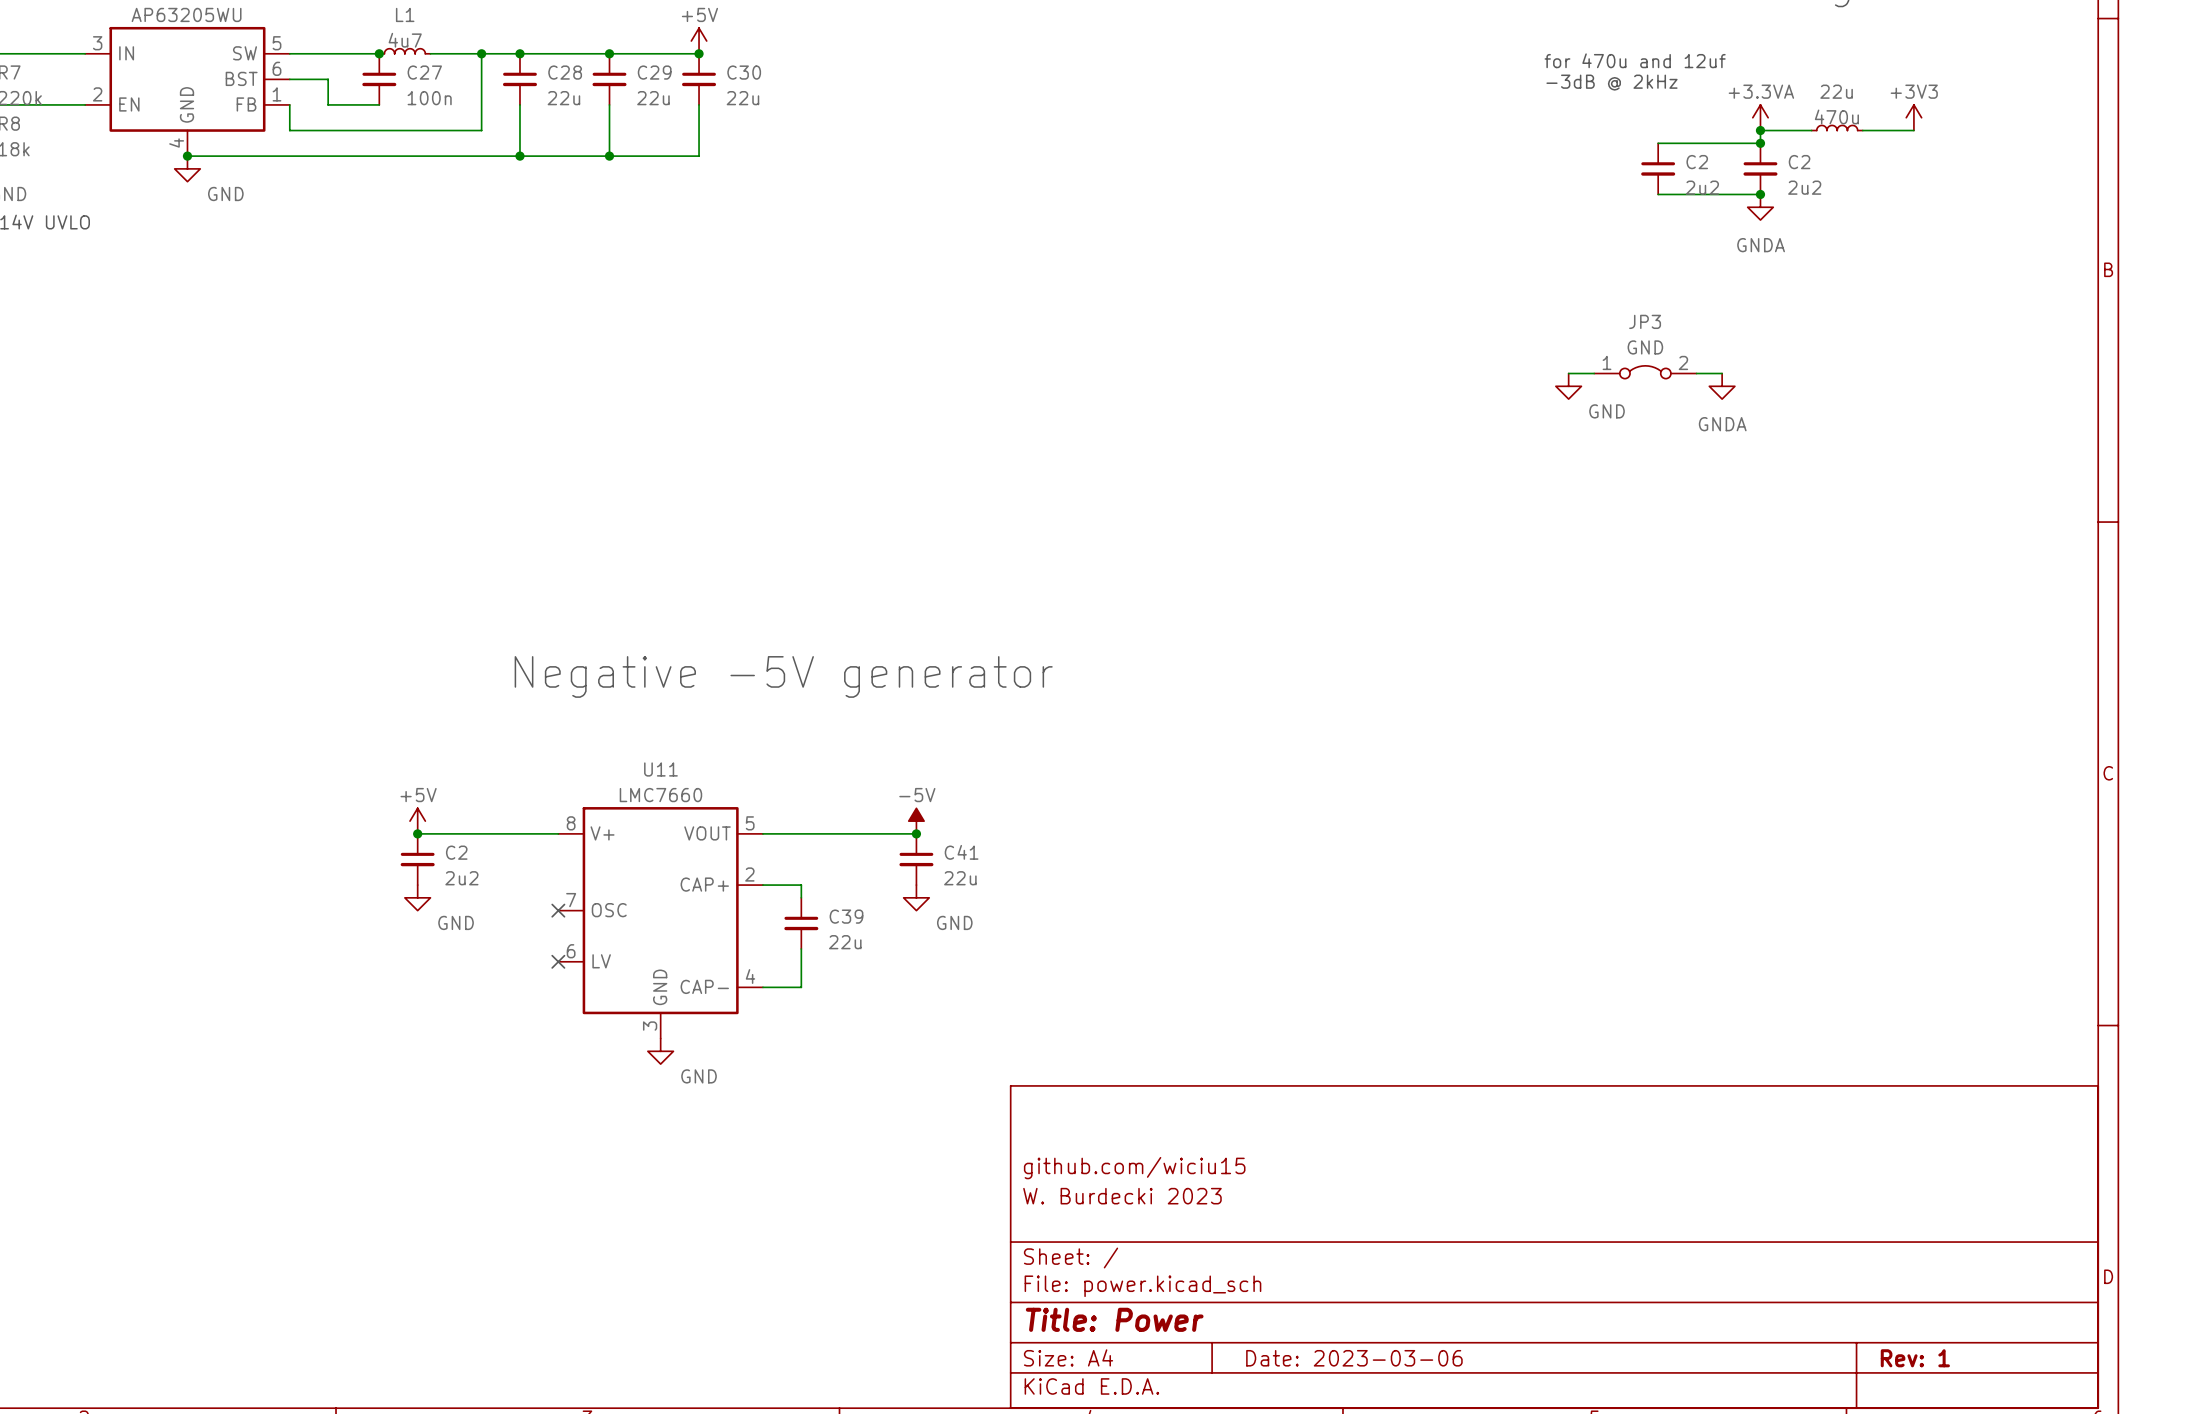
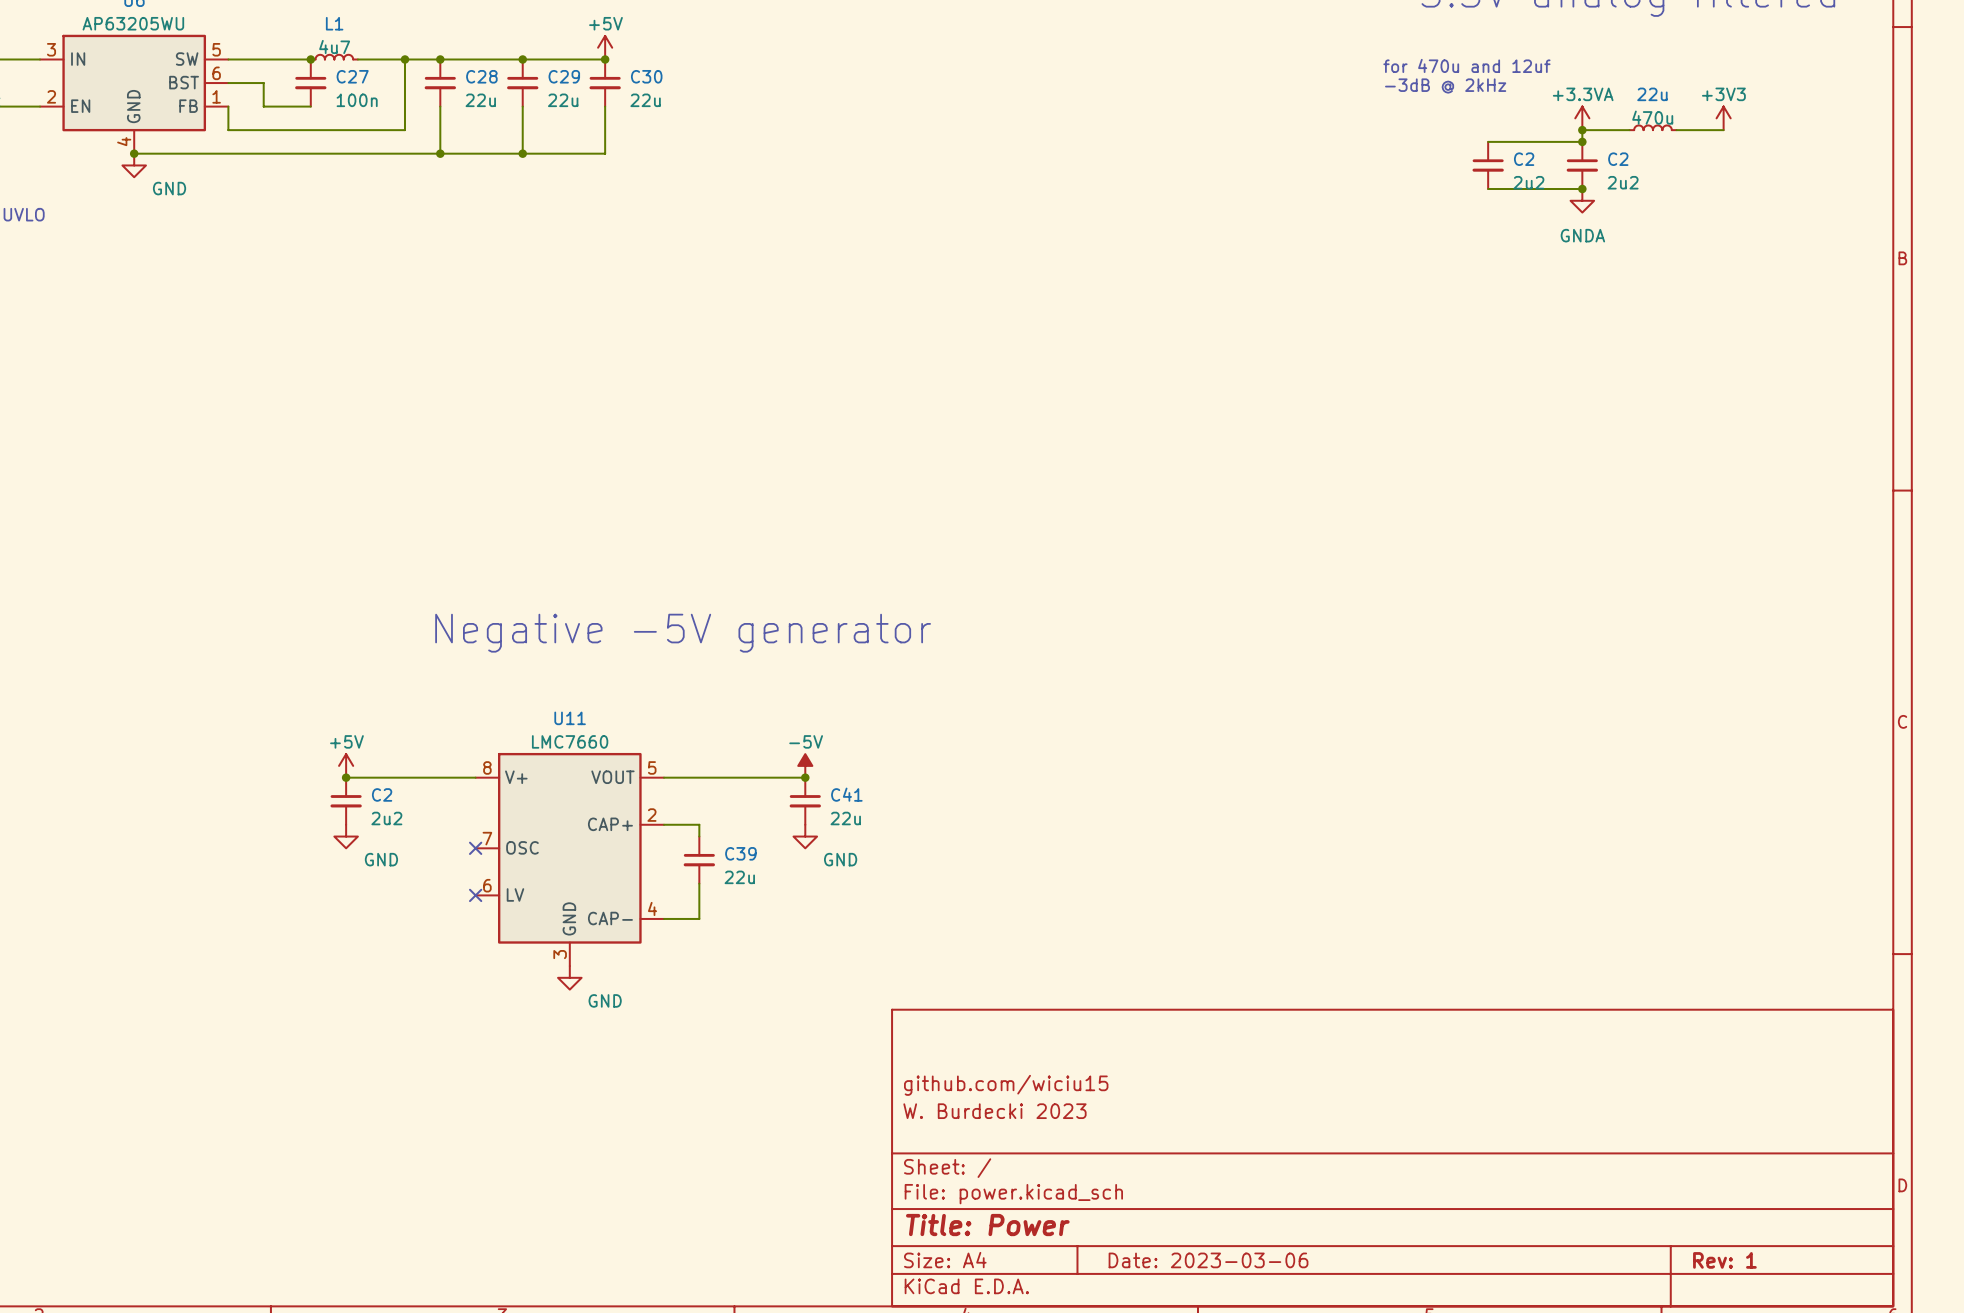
JP3: GND (1645, 372) -> none
wire: (1568, 373) (1594, 373) -> none
wire: (1696, 373) (1722, 373) -> none
power symbol: GND (1568, 386) -> none
power symbol: GNDA (1722, 386) -> none

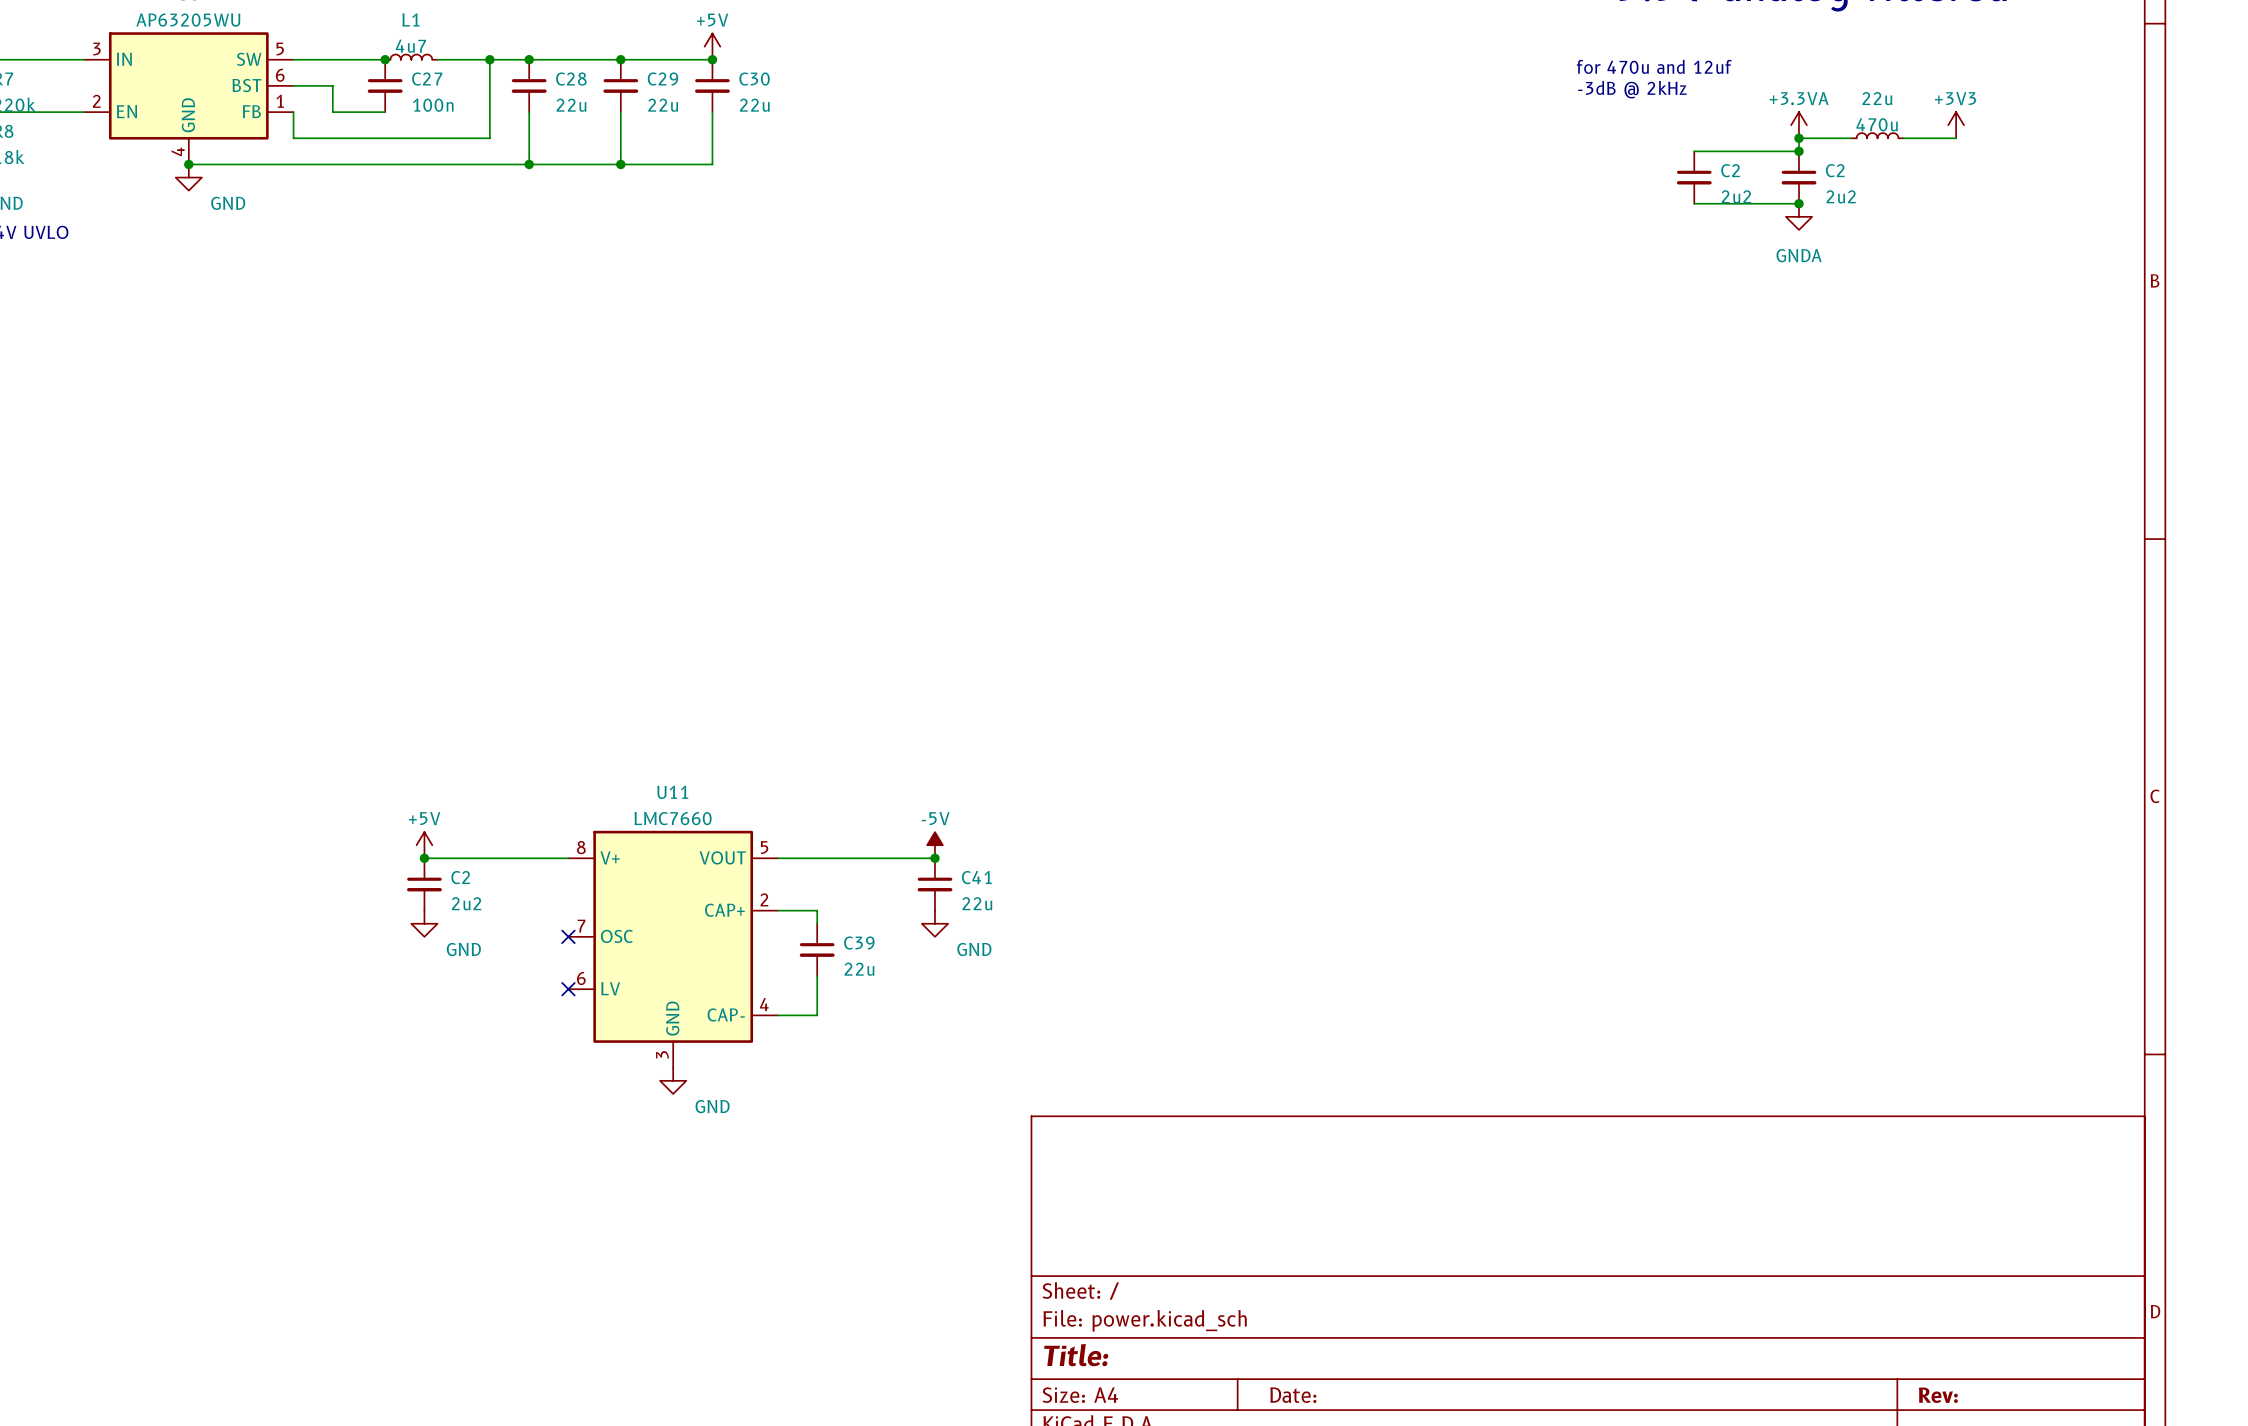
text: Negative -5V generator (683, 633) -> none
title block: github.com/wiciu15 (1006, 1085) -> none
title block: W. Burdecki 2023 (994, 1111) -> none
title block: Title: Power (987, 1225) -> Title: (1076, 1355)
title block: Date: 2023-03-06 (1208, 1260) -> Date: (1293, 1395)
title block: Rev: 1 (1724, 1260) -> Rev: (1938, 1395)

